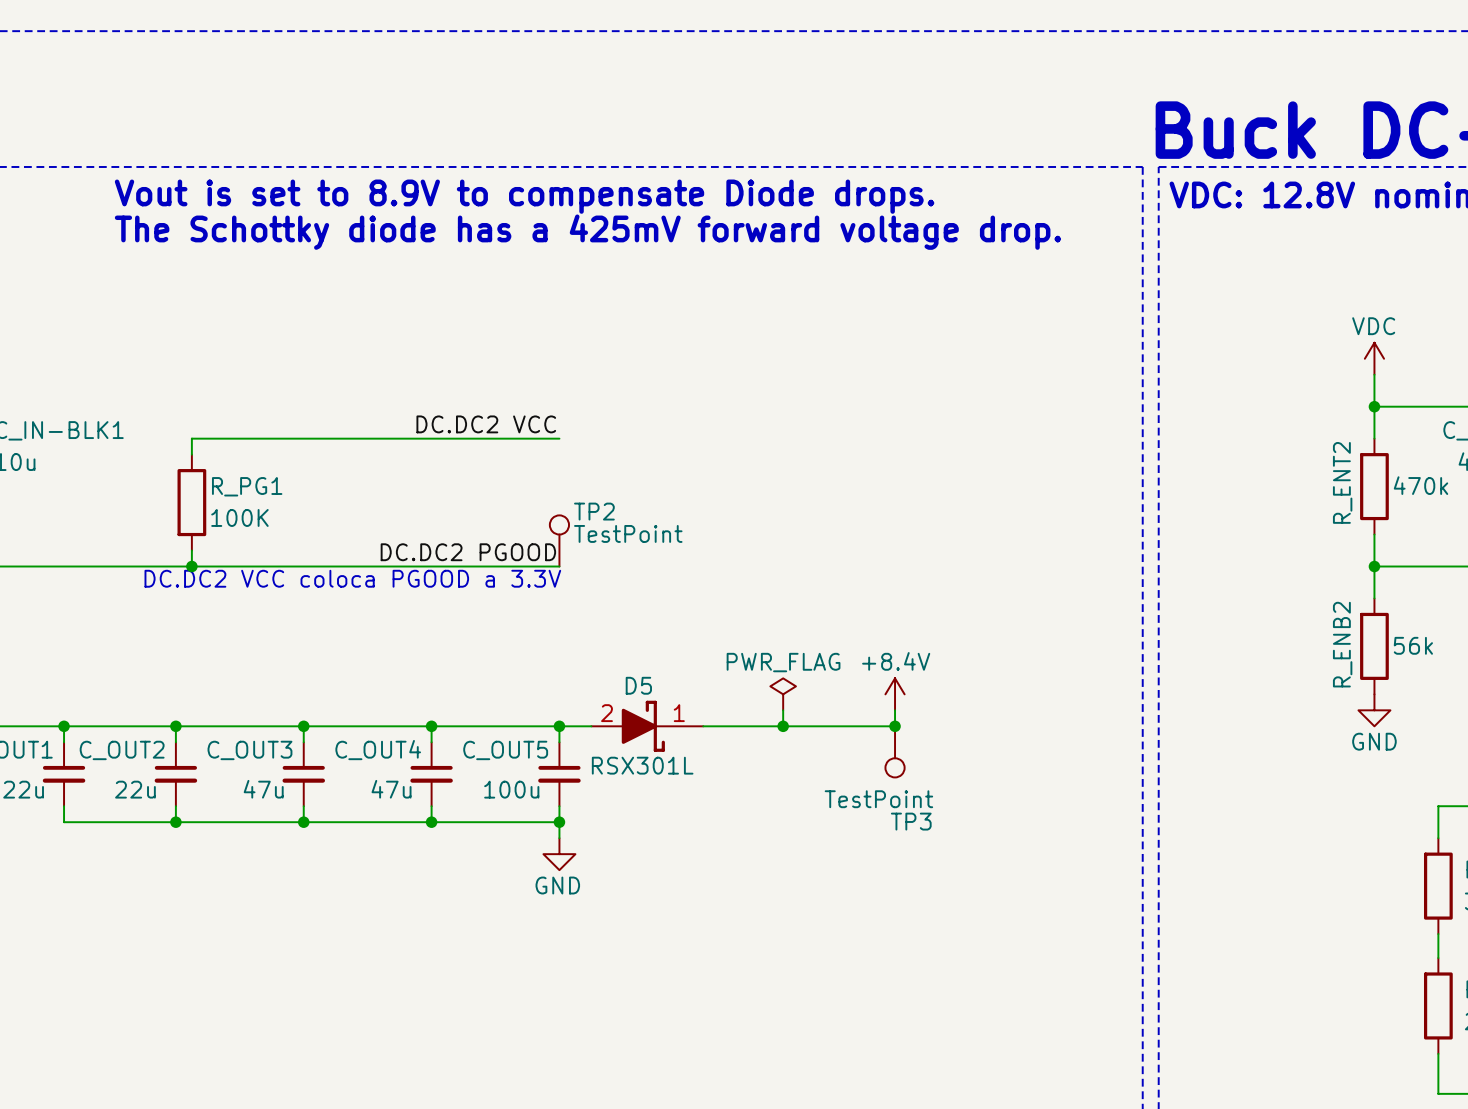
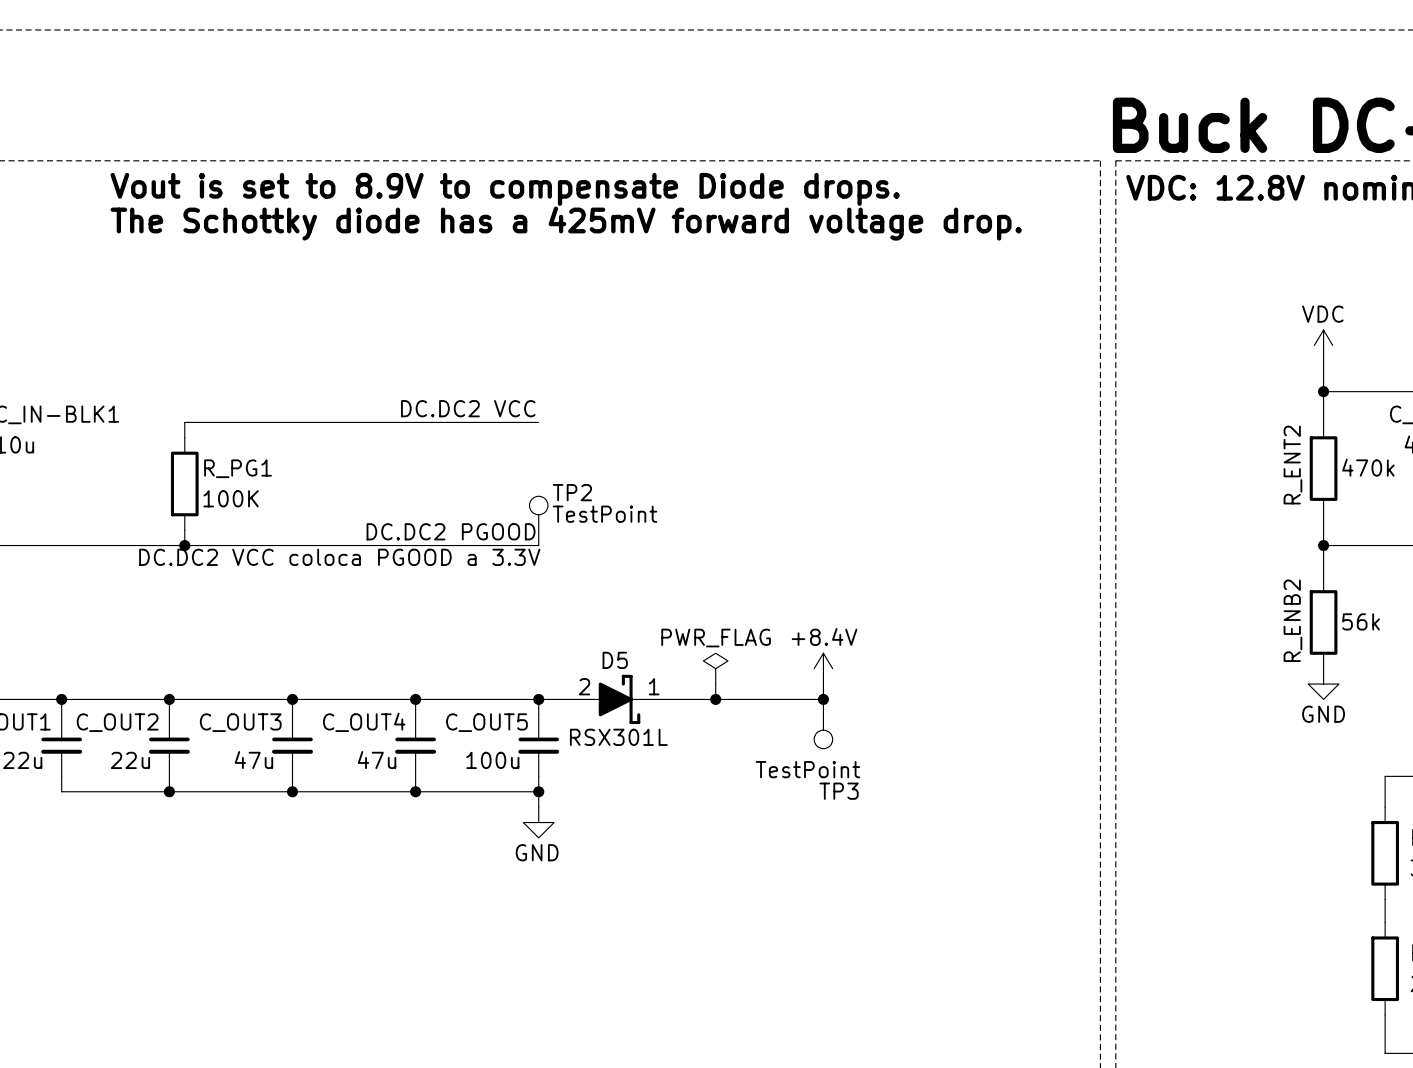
power symbol position: PWR_FLAG (783, 694) -> PWR_FLAG (715, 668)
power symbol position: +8.4V (895, 694) -> +8.4V (823, 668)
wire: (783, 710) (783, 726) -> (715, 684) (715, 699)
wire: (895, 710) (895, 726) (855, 726) -> (823, 684) (823, 699)
junction: none -> (715, 699)
junction: (783, 726) -> none
junction: none -> (823, 699)
junction: (895, 726) -> none
TP3 position: (895, 751) -> (823, 724)

